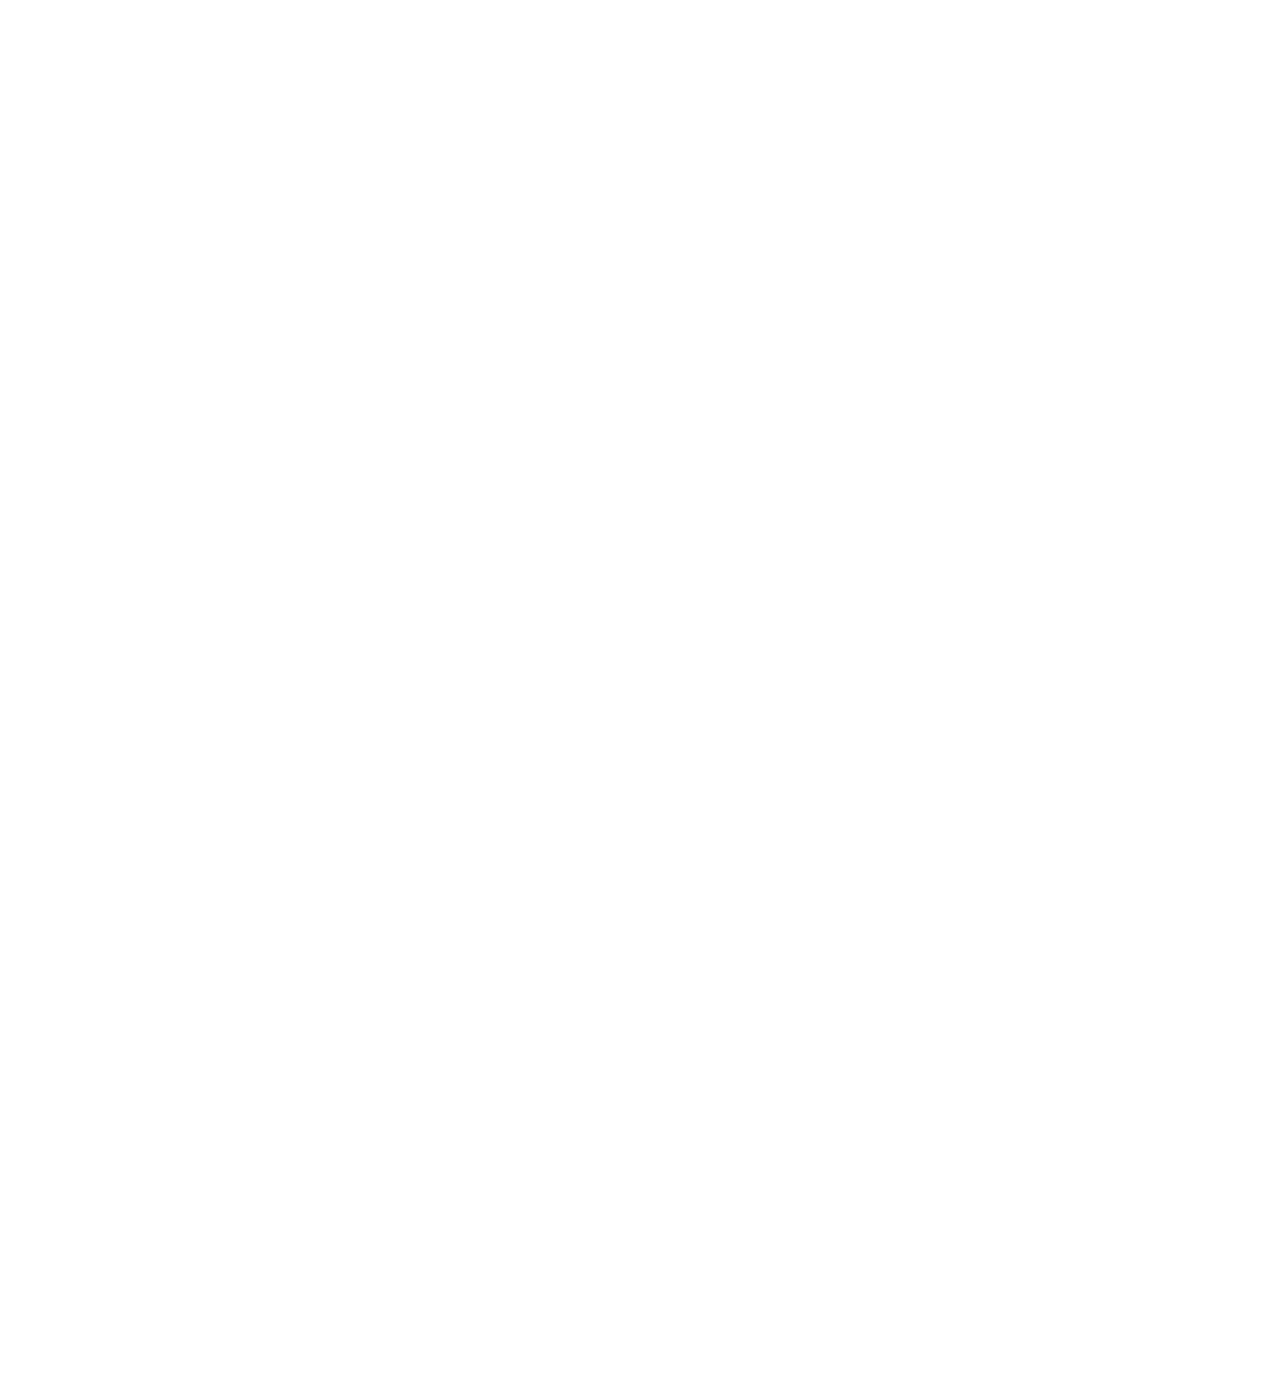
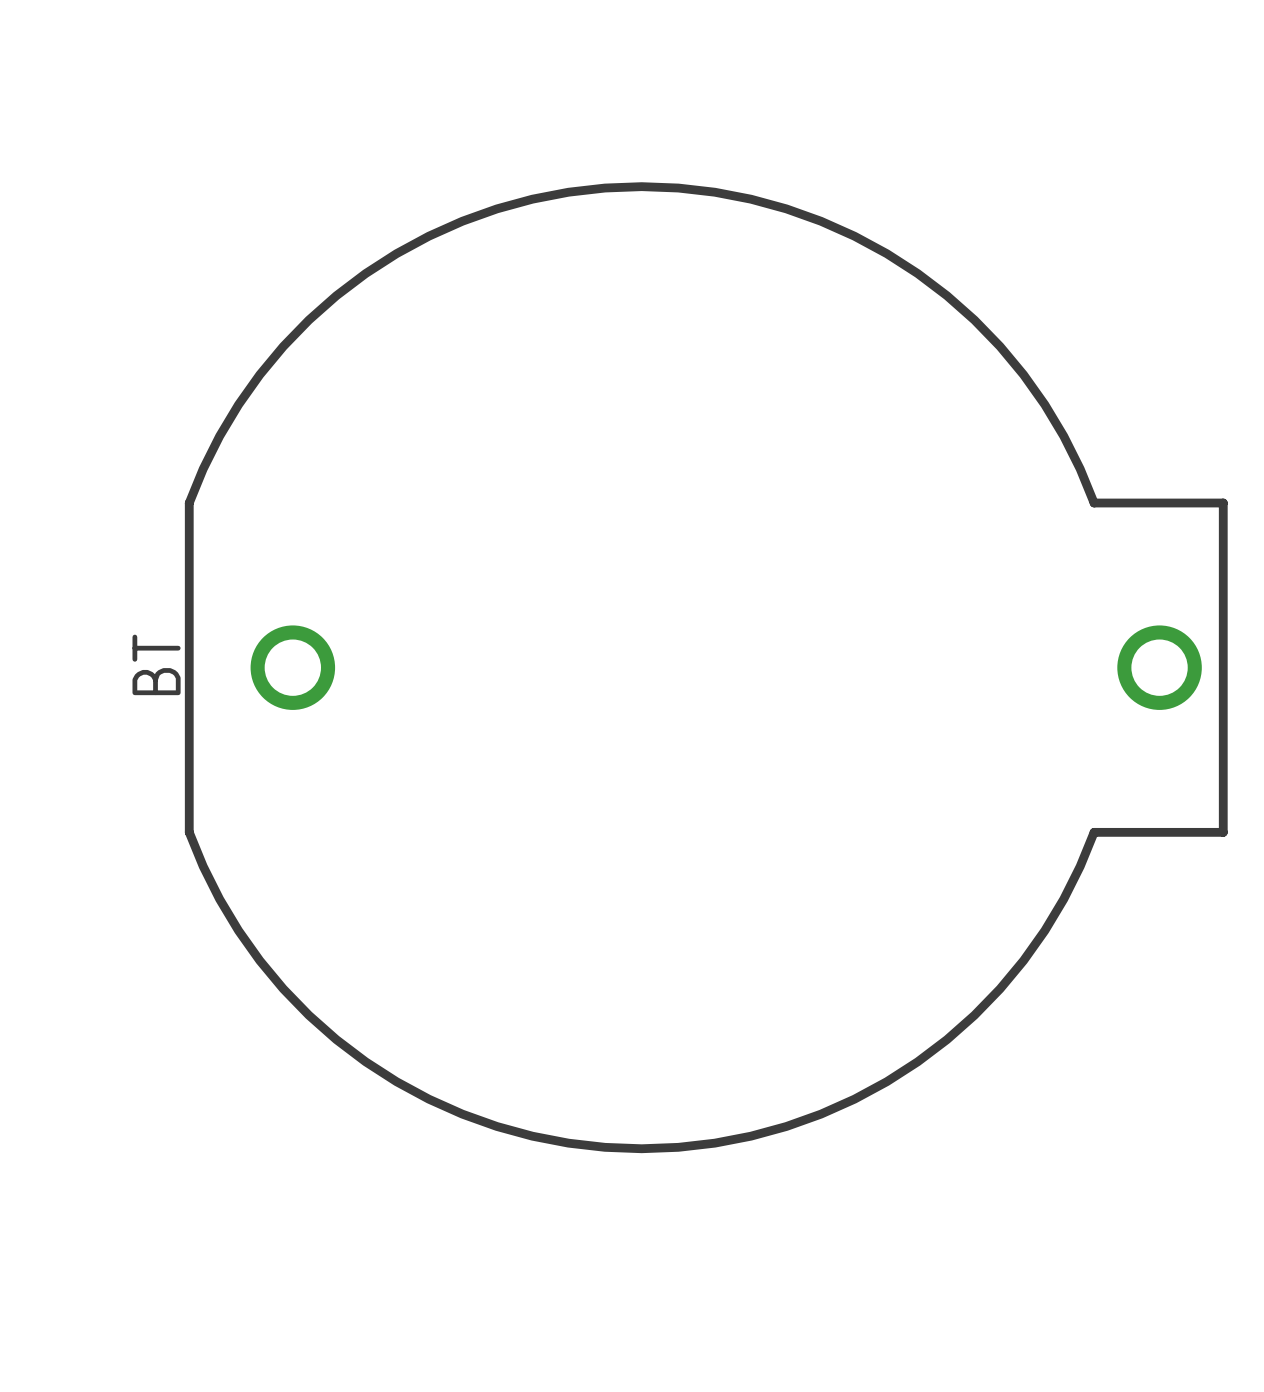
BT: none -> (706, 667)

